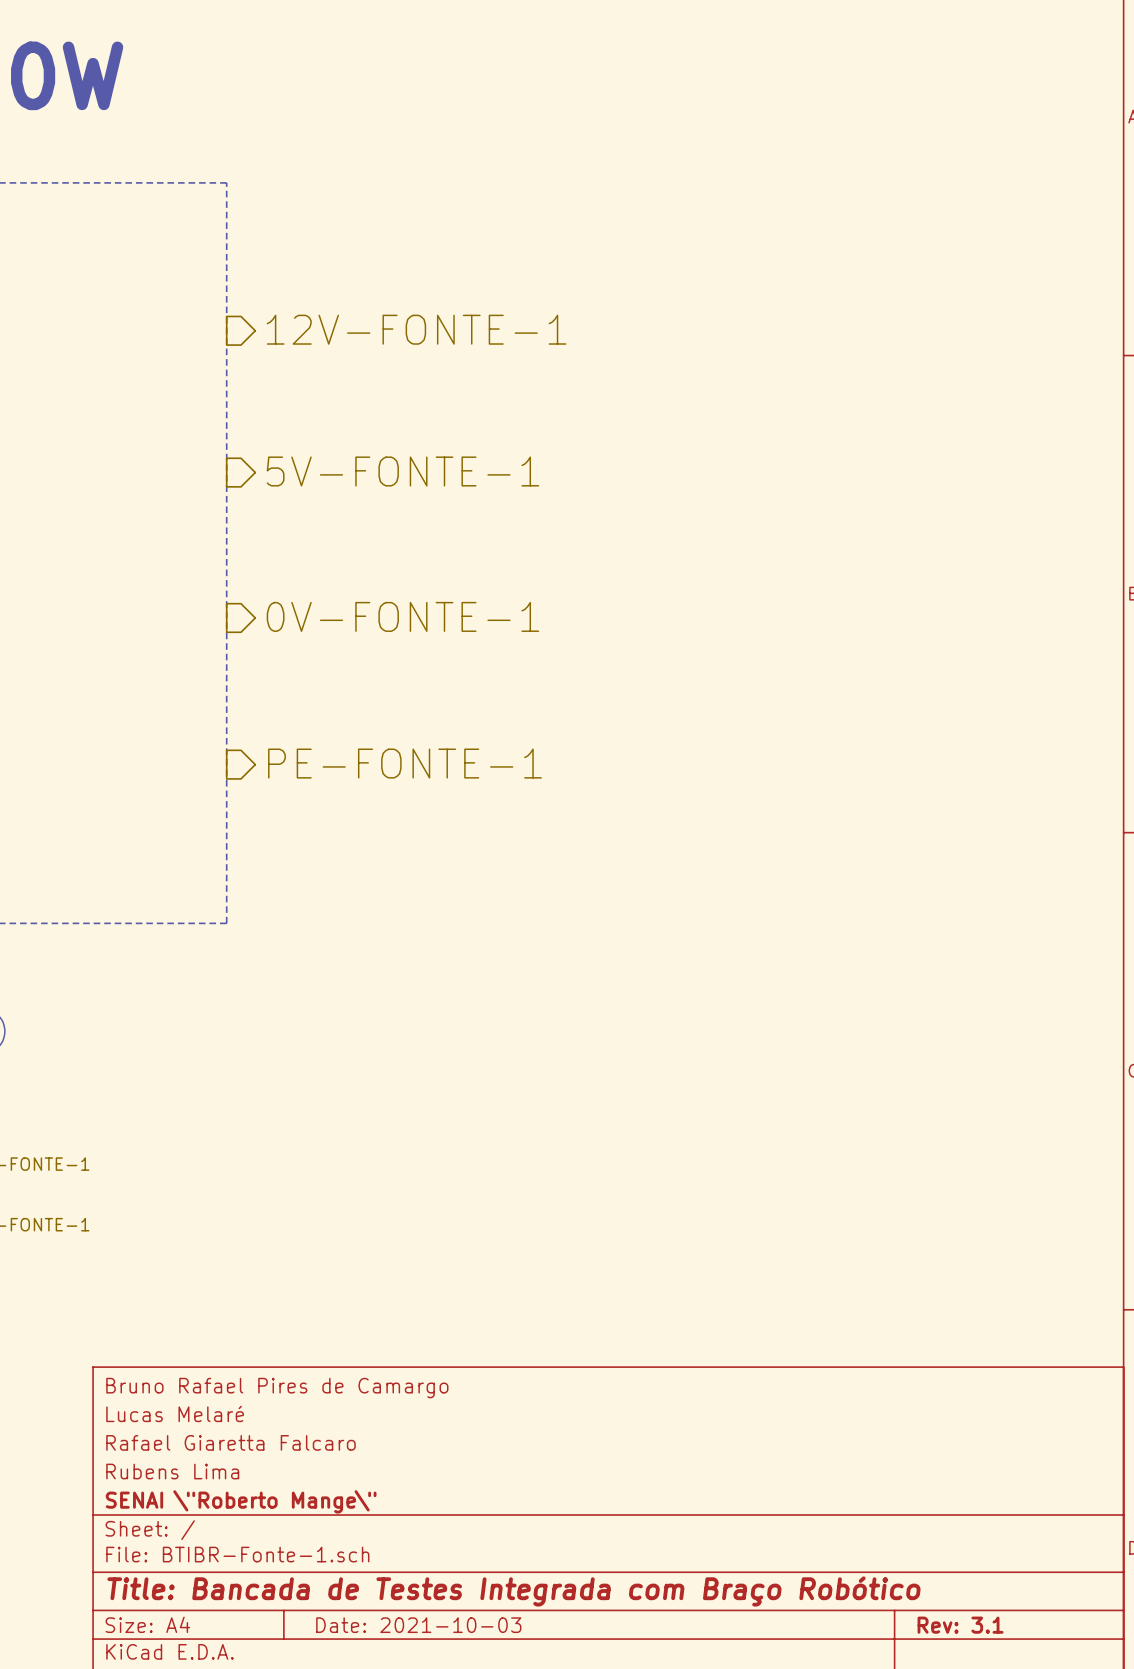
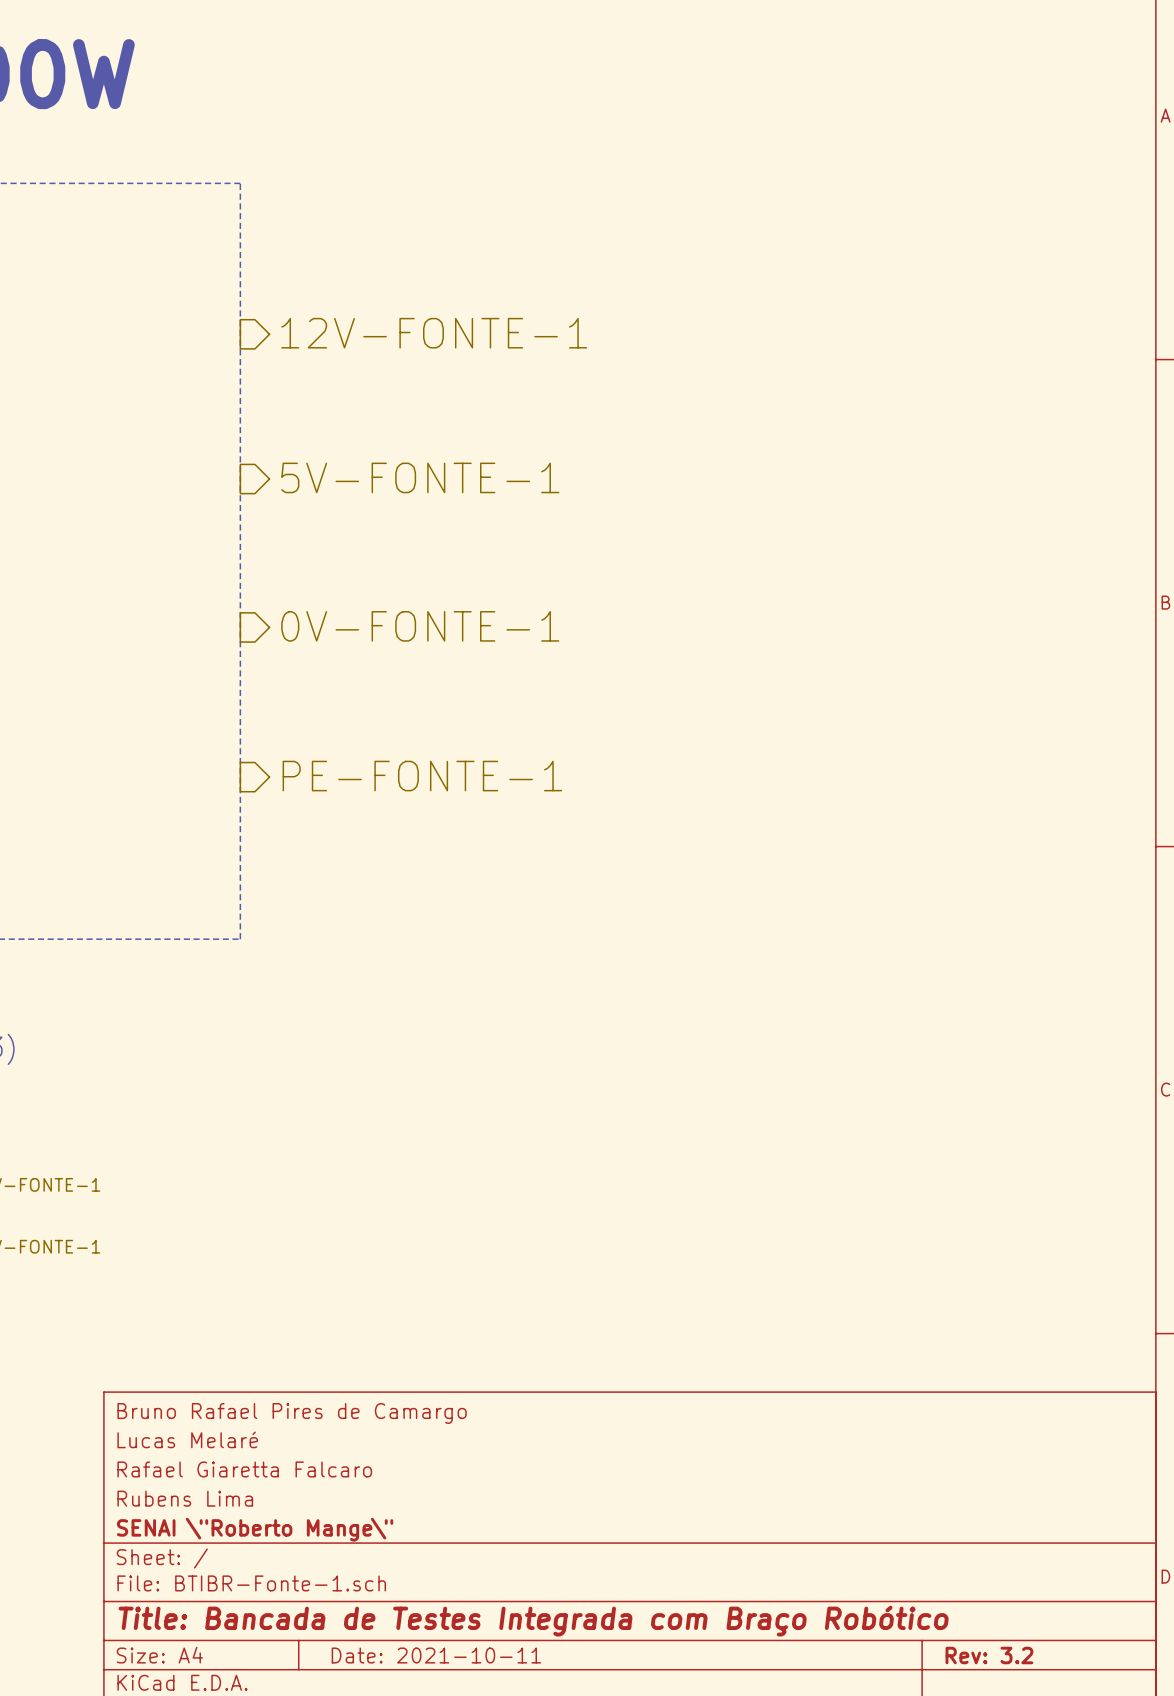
title block: Date: 2021-10-03 (418, 1625) -> Date: 2021-10-11 (436, 1655)
title block: Rev: 3.1 (960, 1625) -> Rev: 3.2 (989, 1655)

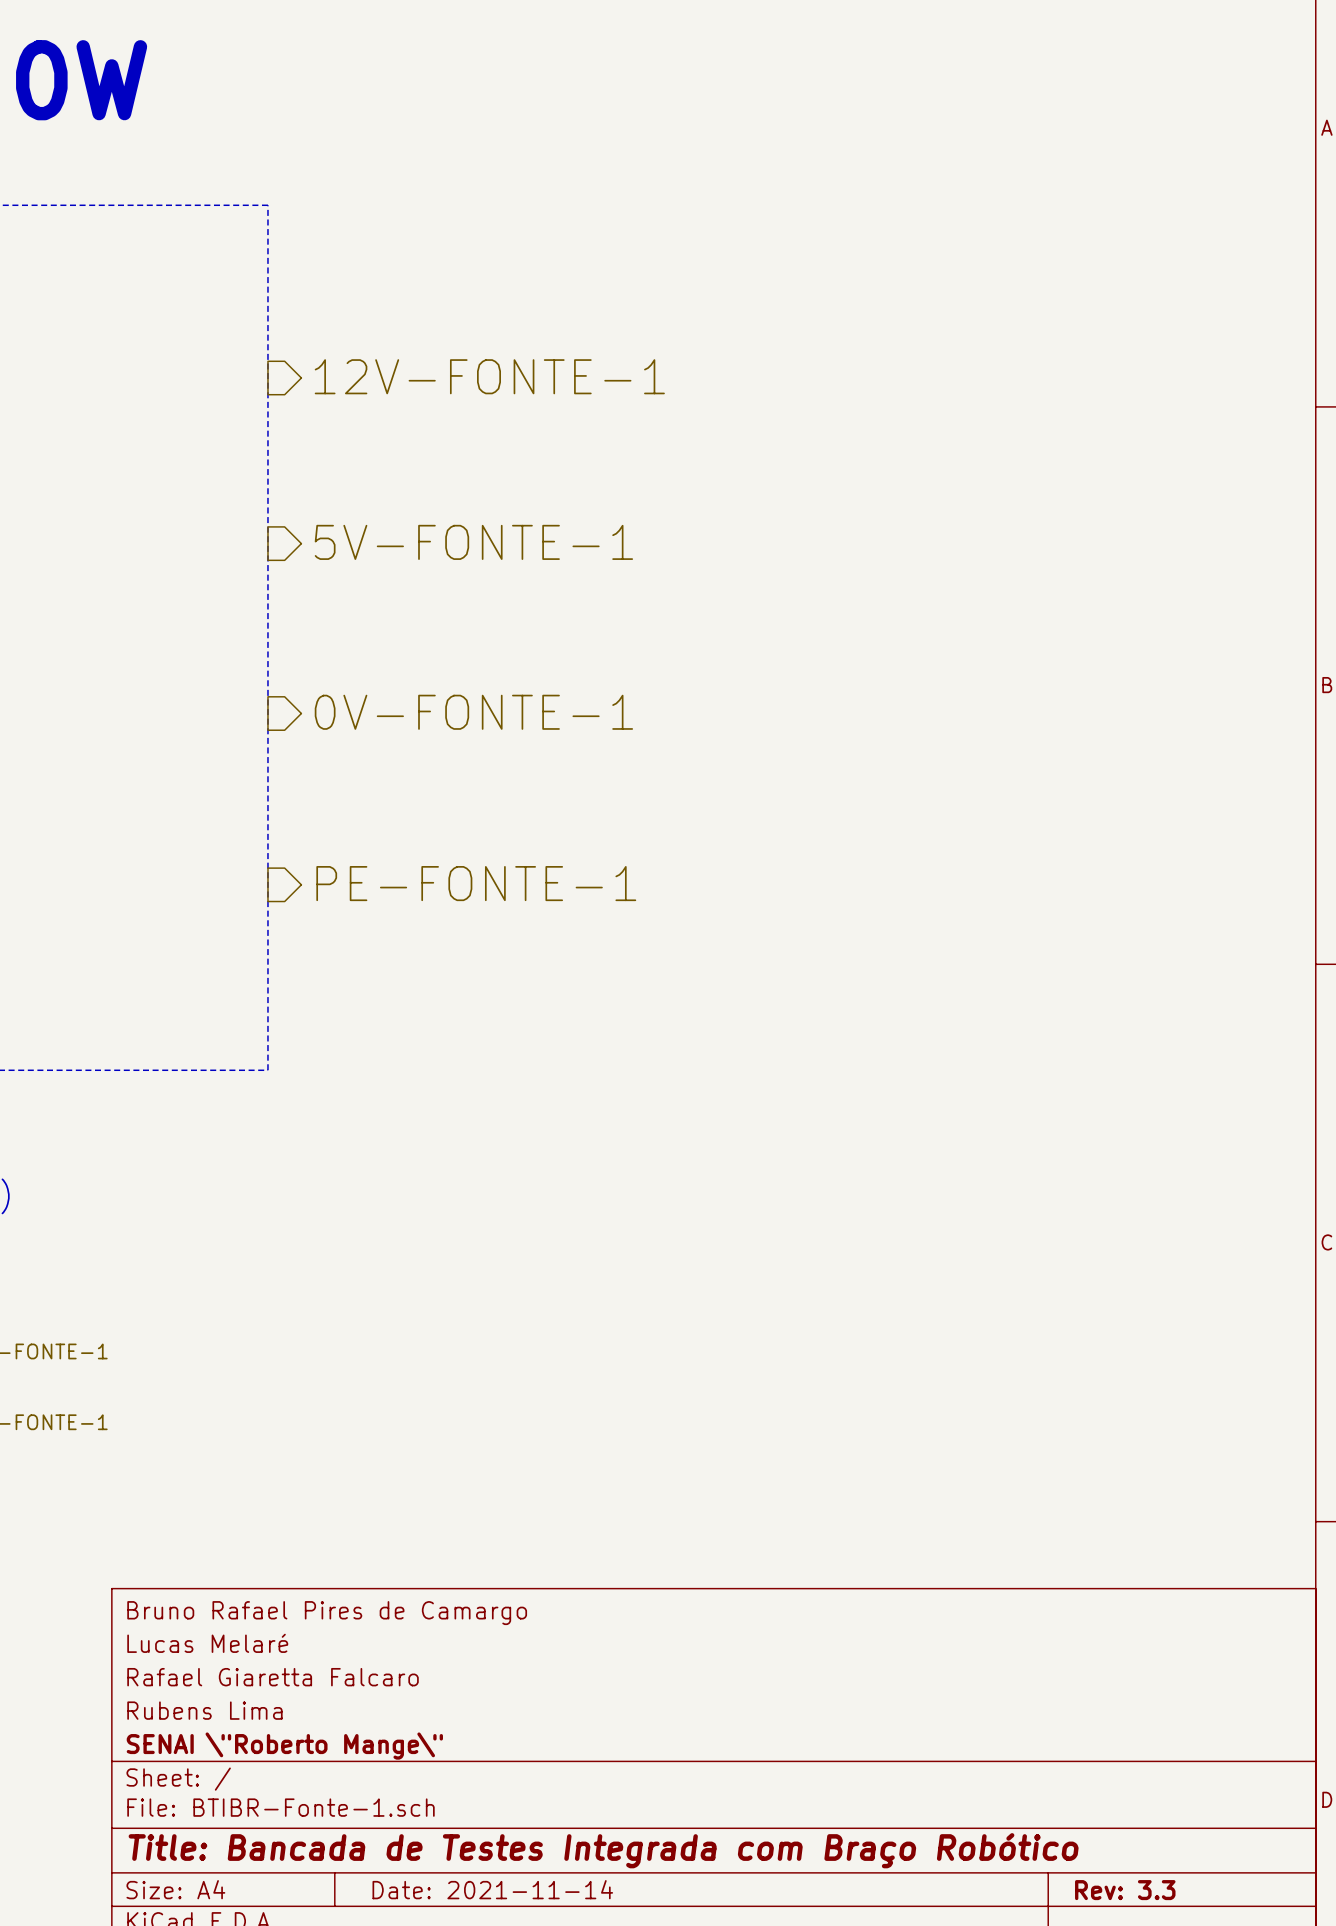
title block: Date: 2021-10-11 (436, 1655) -> Date: 2021-11-14 (492, 1889)
title block: Rev: 3.2 (989, 1655) -> Rev: 3.3 (1125, 1890)

